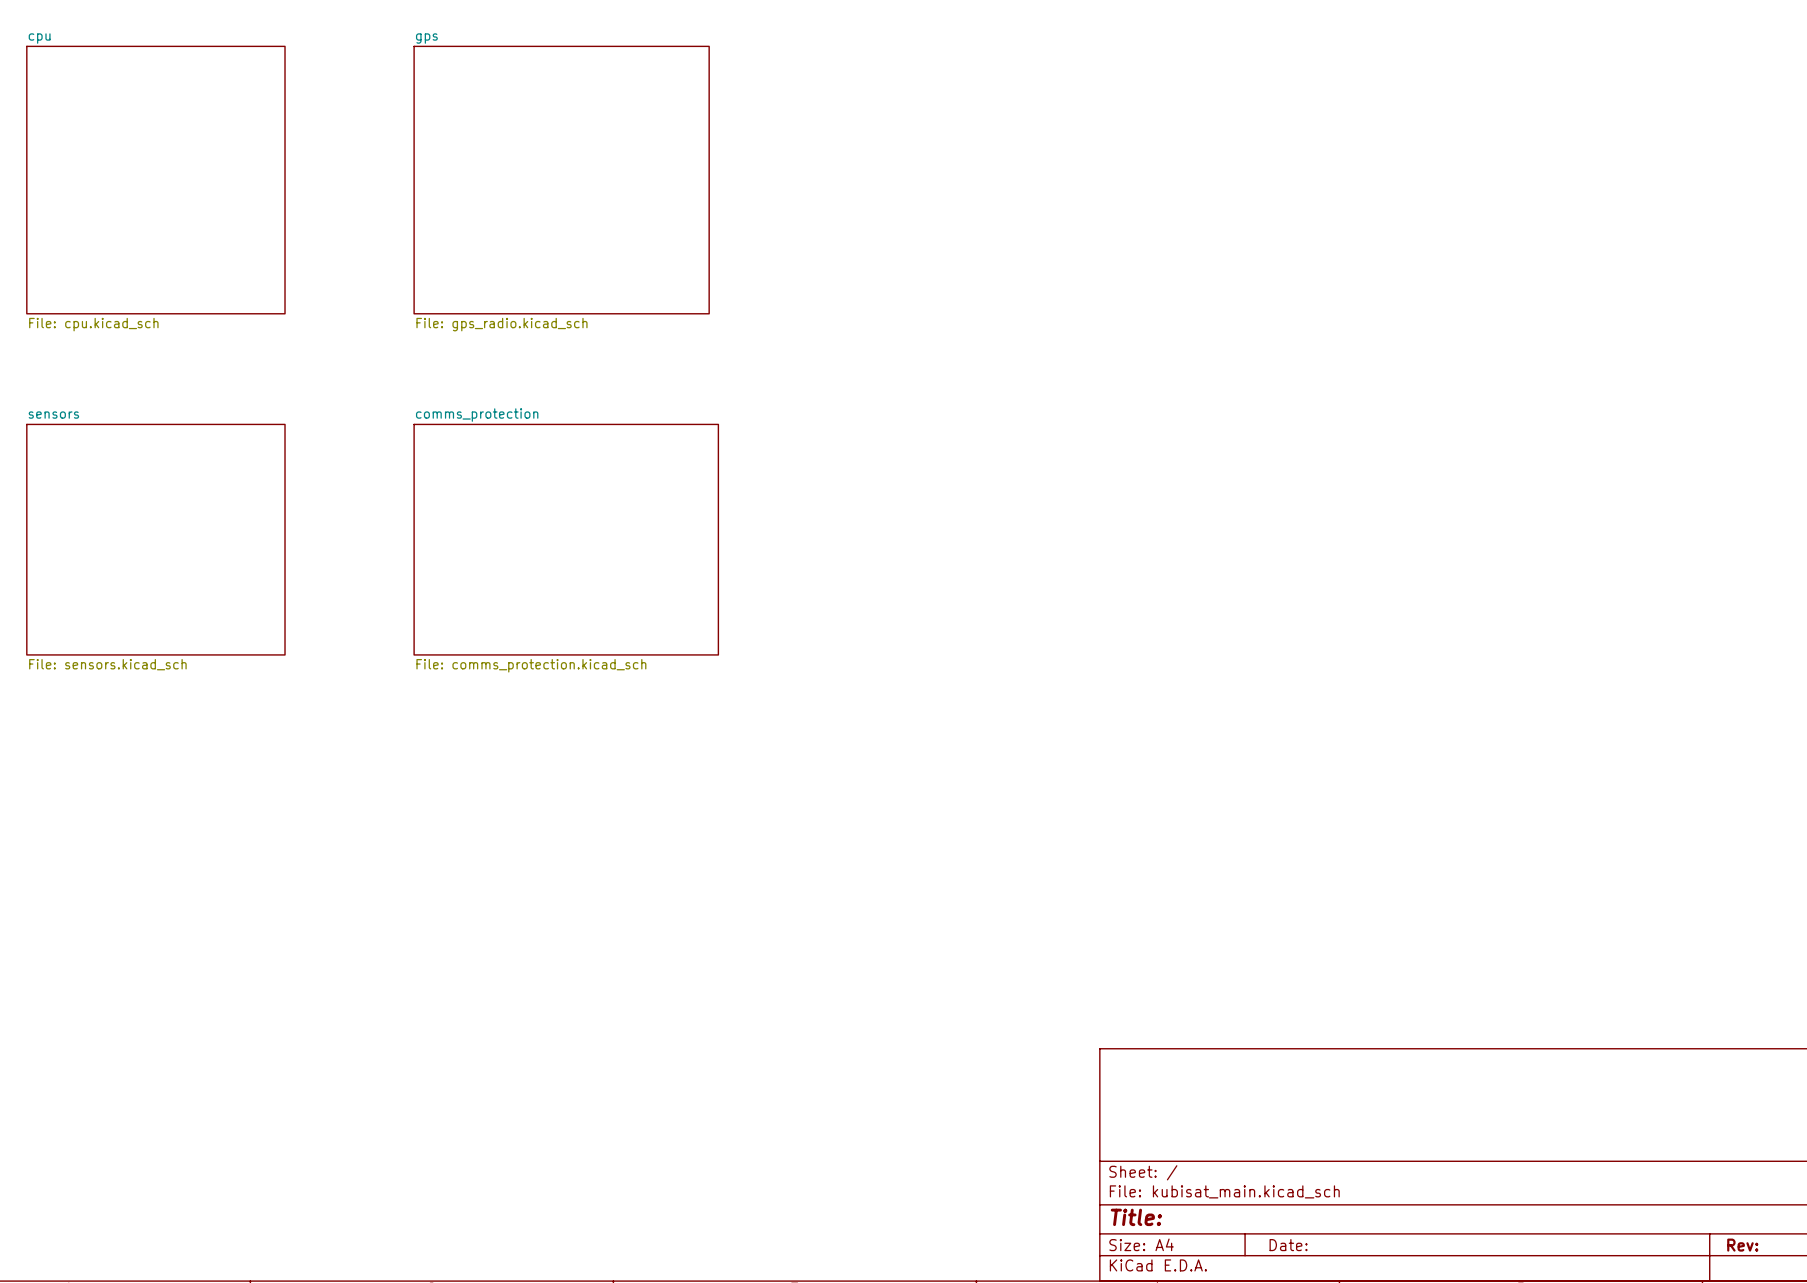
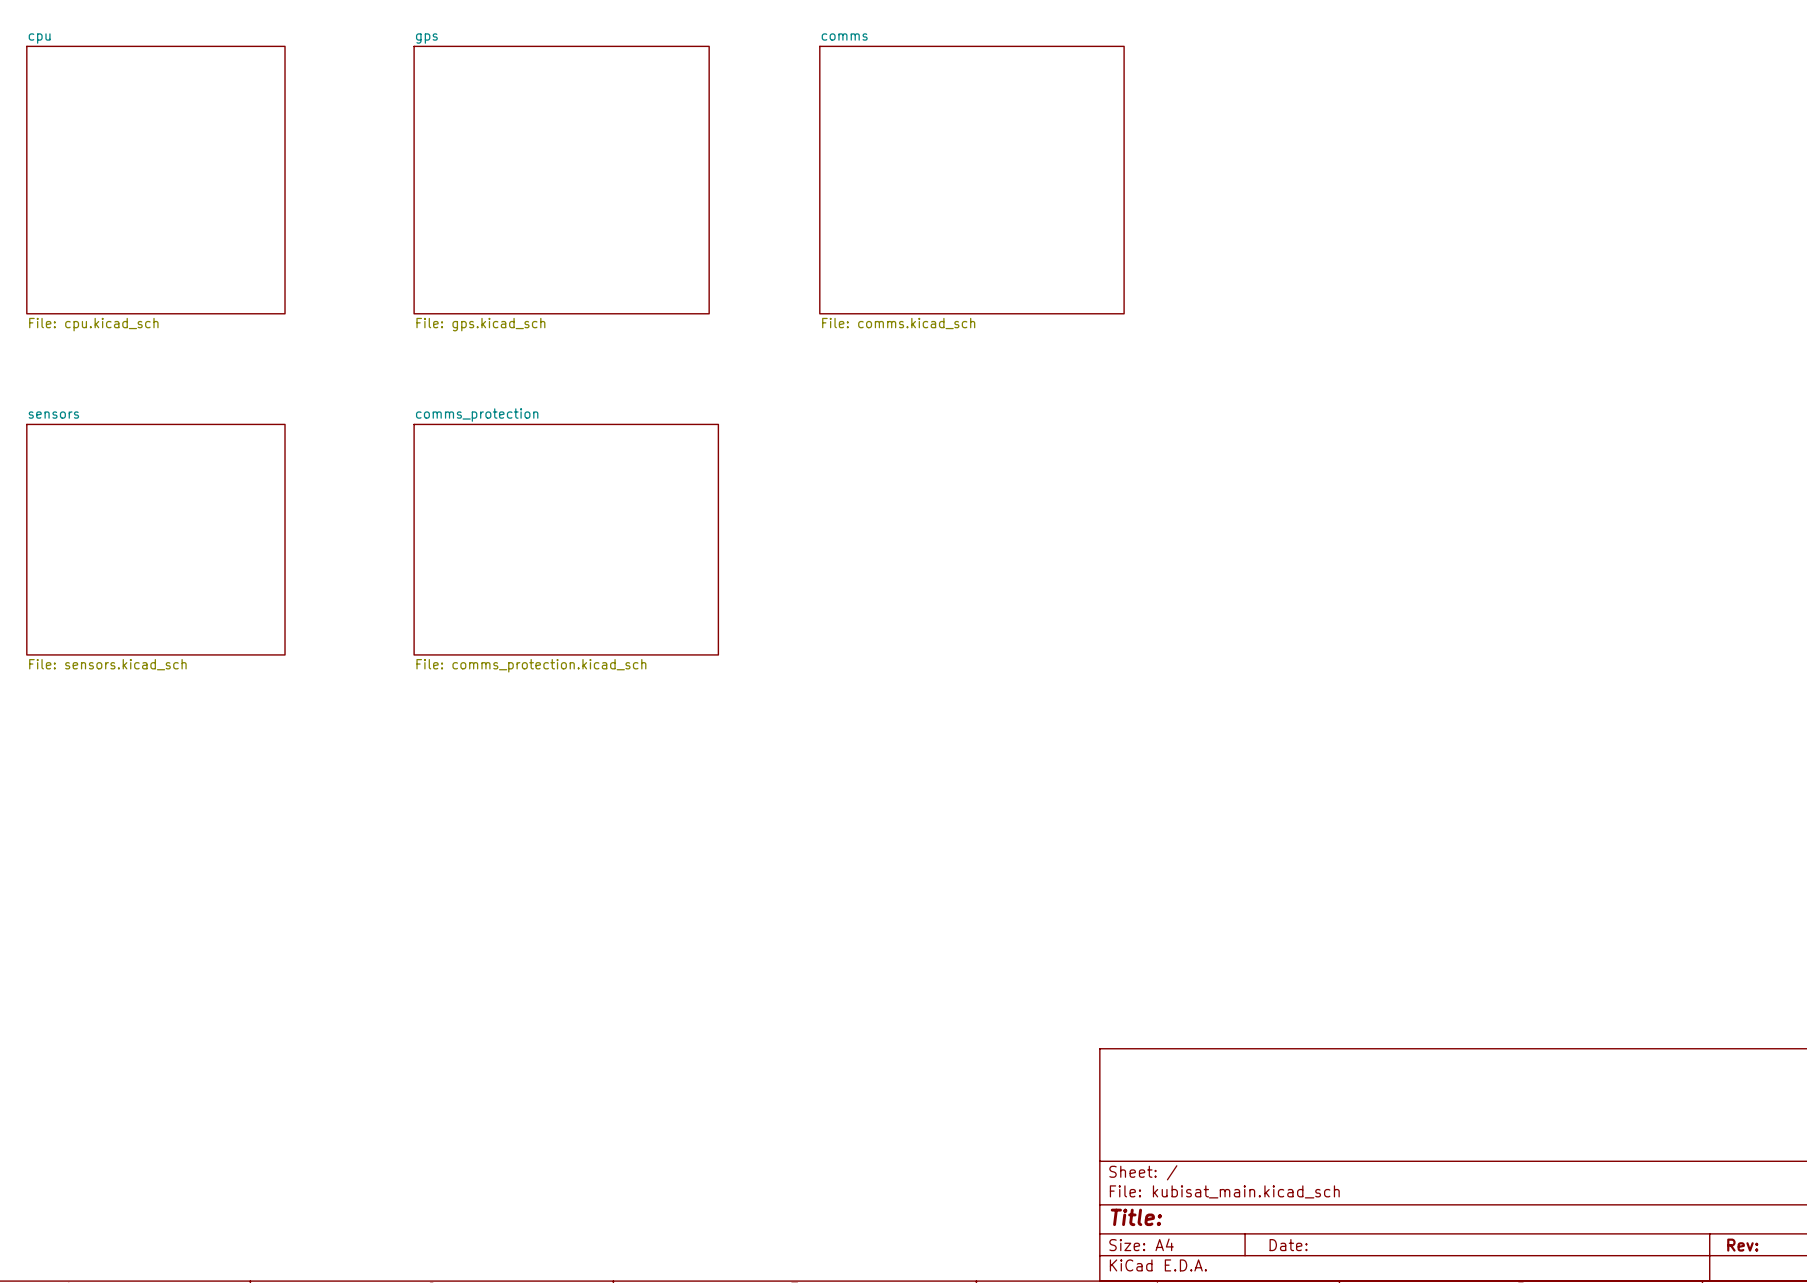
sheet comms: none -> File: comms.kicad_sch (971, 180)
sheet gps value: File: gps_radio.kicad_sch (501, 324) -> File: gps.kicad_sch (480, 324)

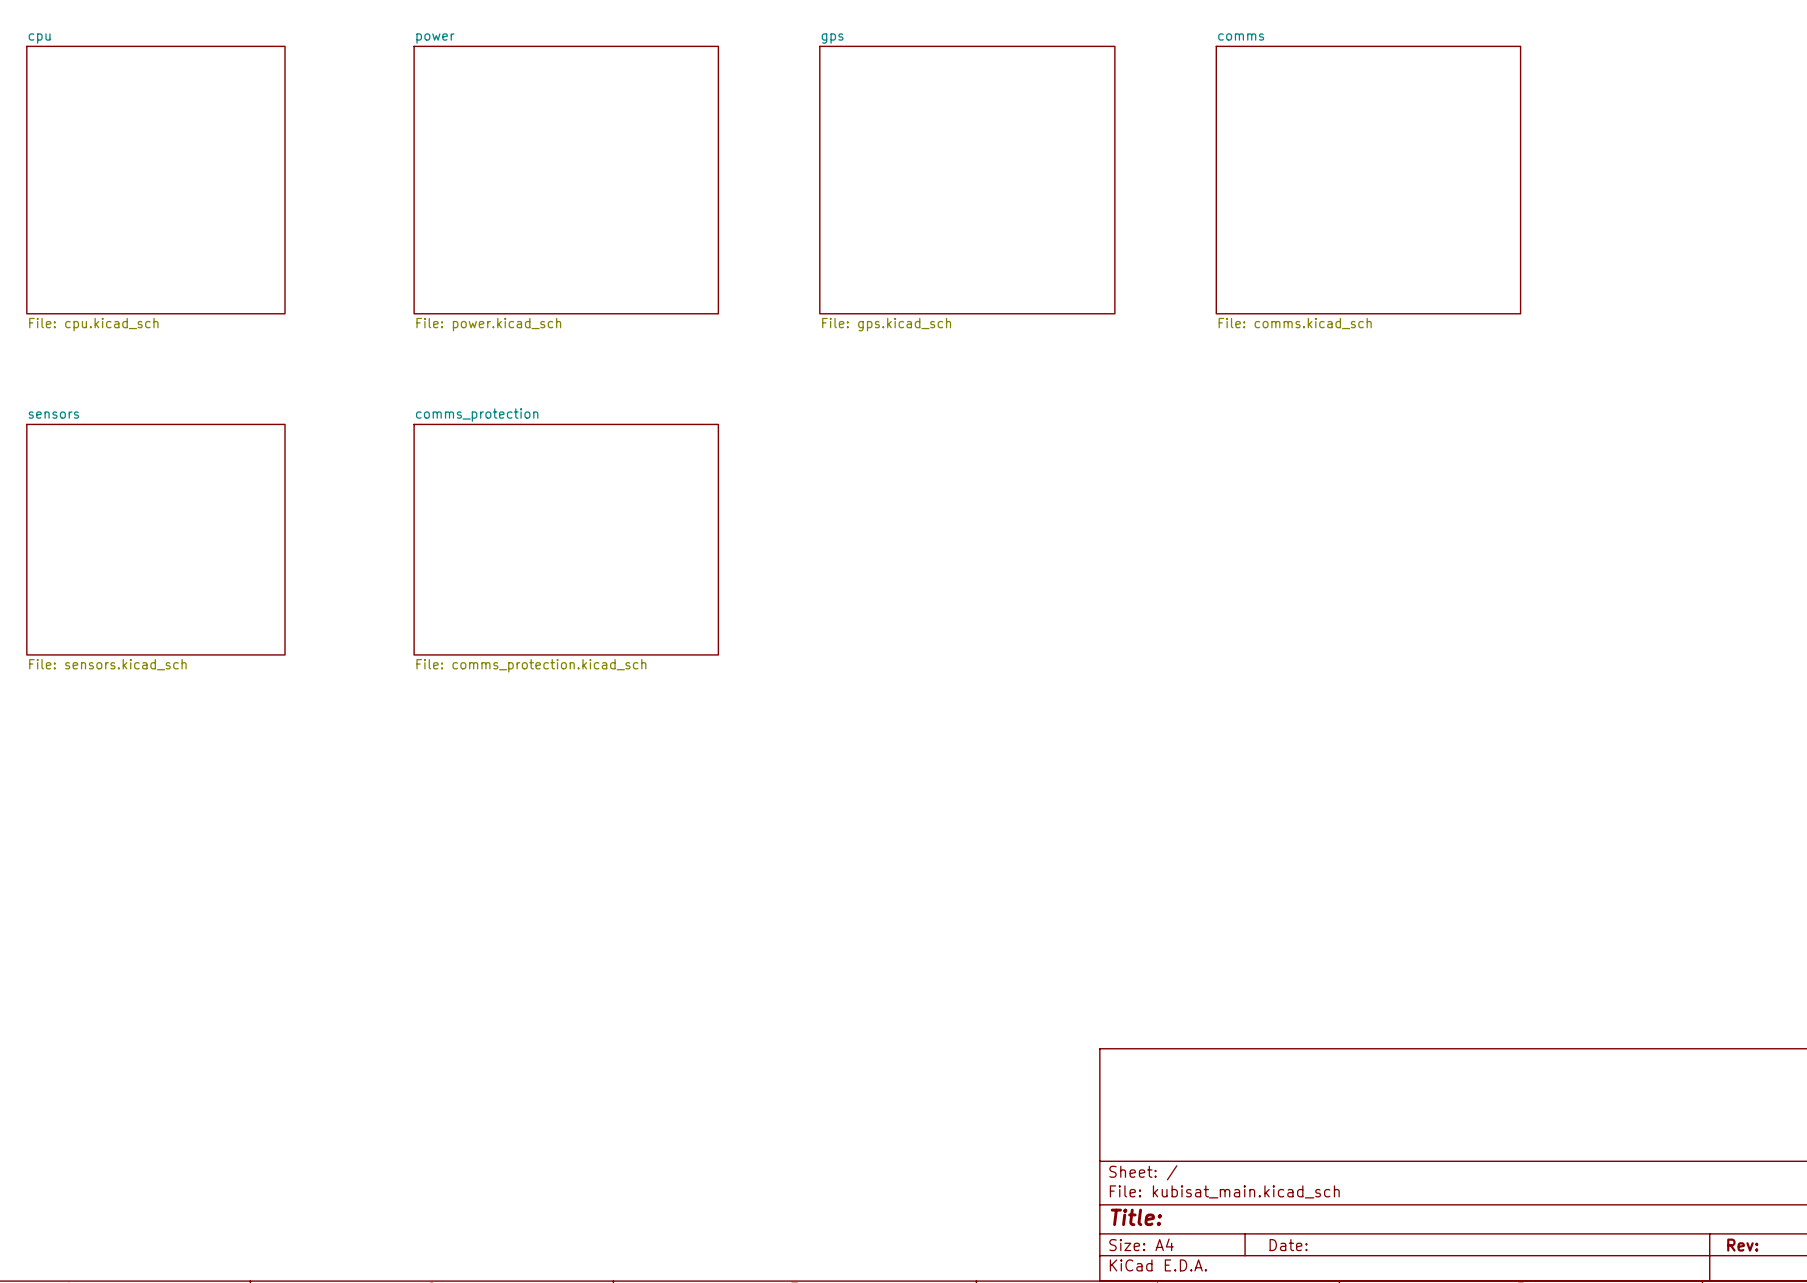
sheet gps: File: gps.kicad_sch (561, 180) -> none
sheet power: none -> File: power.kicad_sch (566, 180)
sheet gps: none -> File: gps.kicad_sch (967, 180)
sheet comms: File: comms.kicad_sch (971, 180) -> none
sheet comms: none -> File: comms.kicad_sch (1368, 180)

